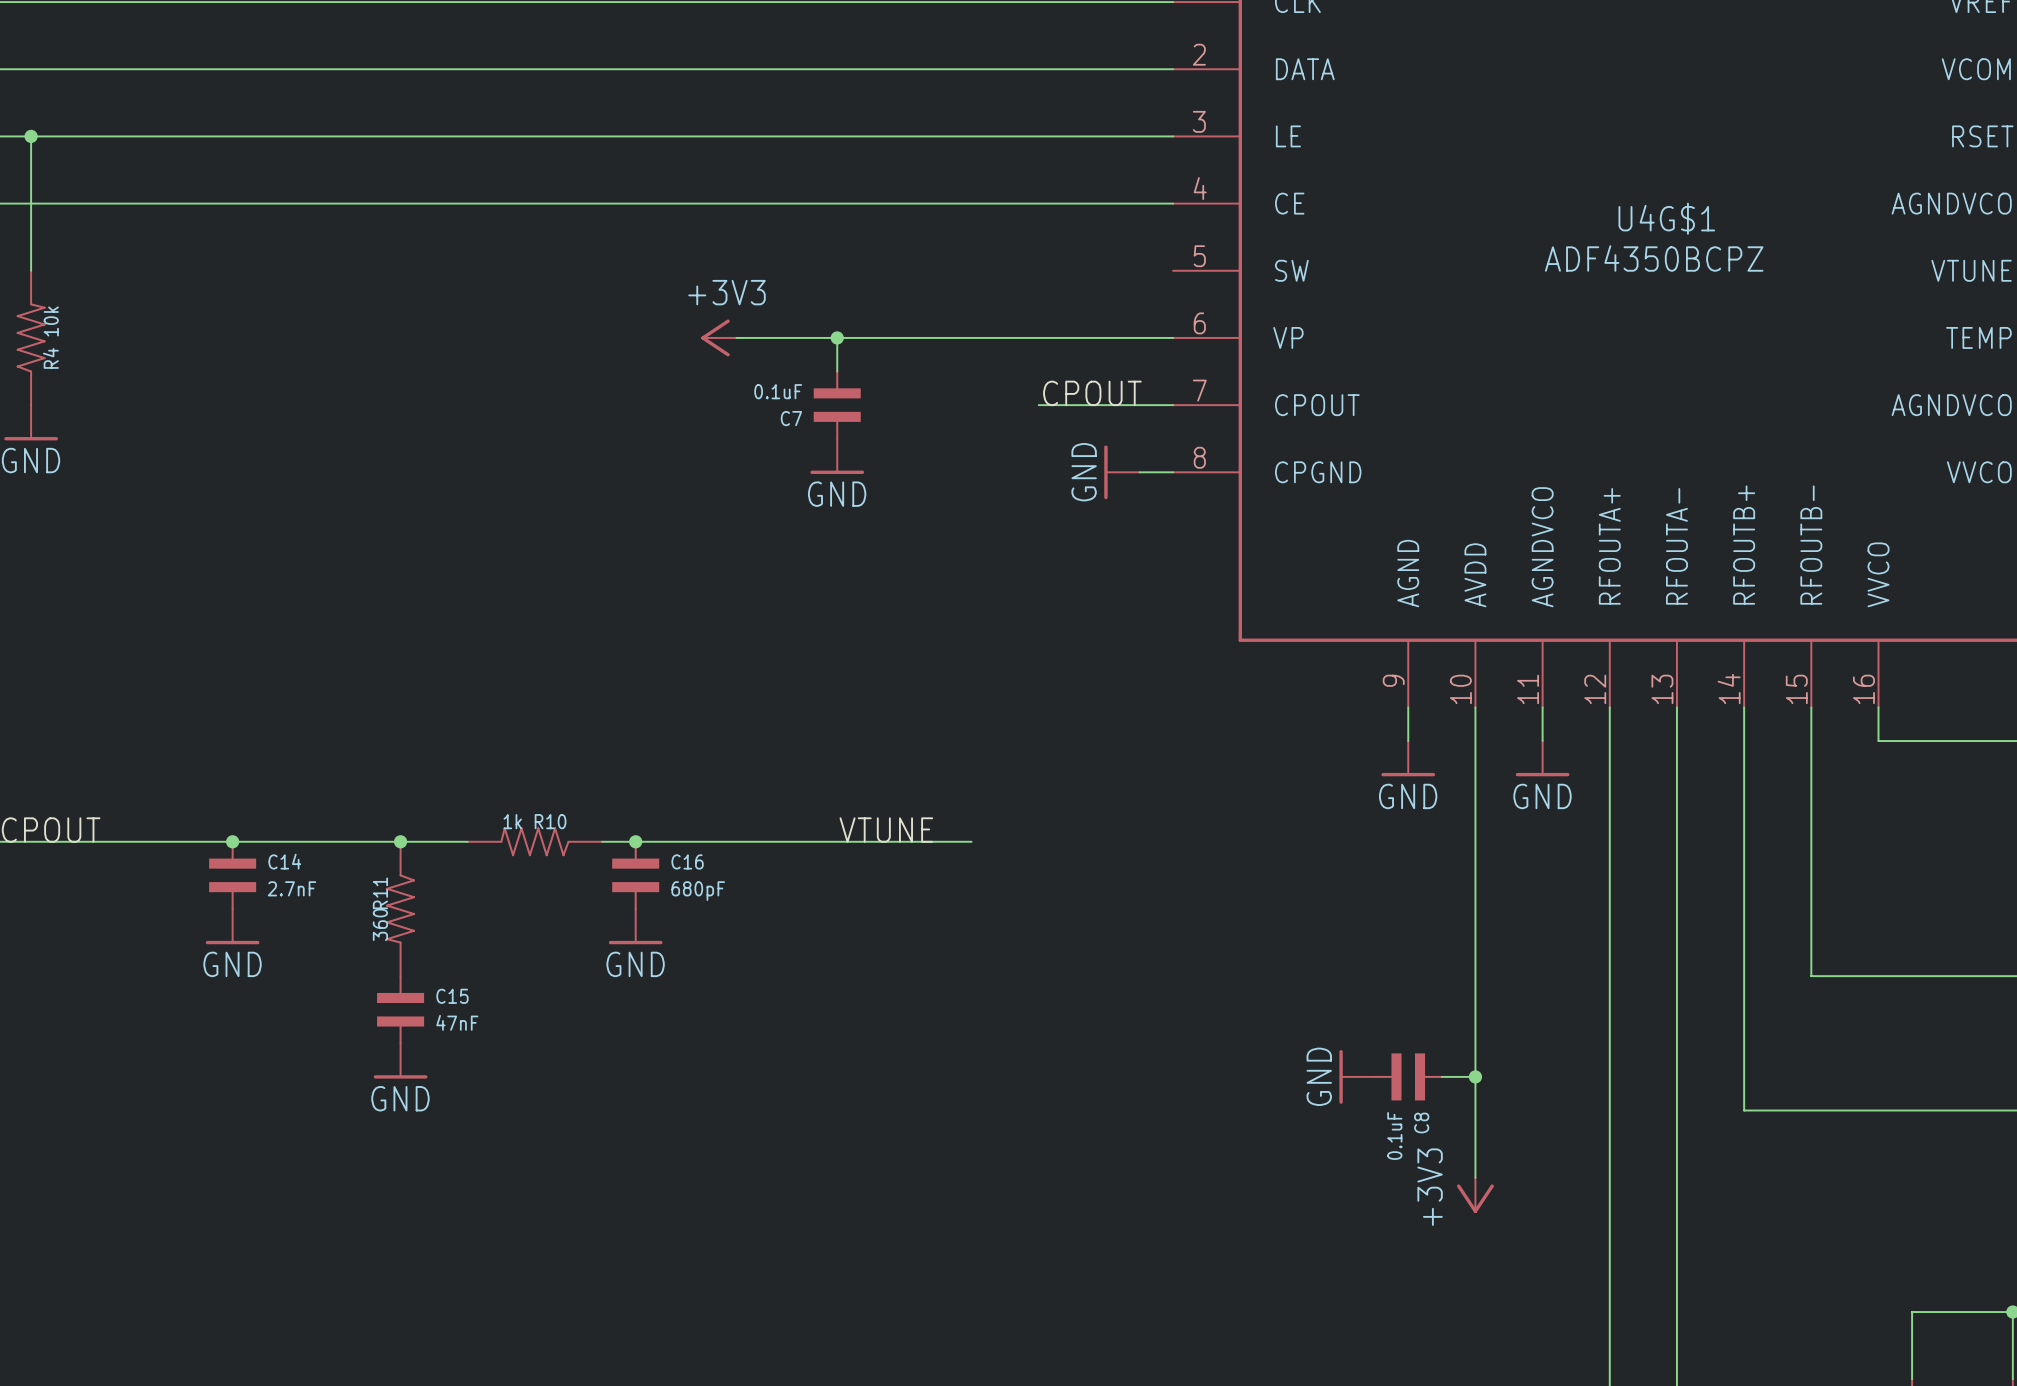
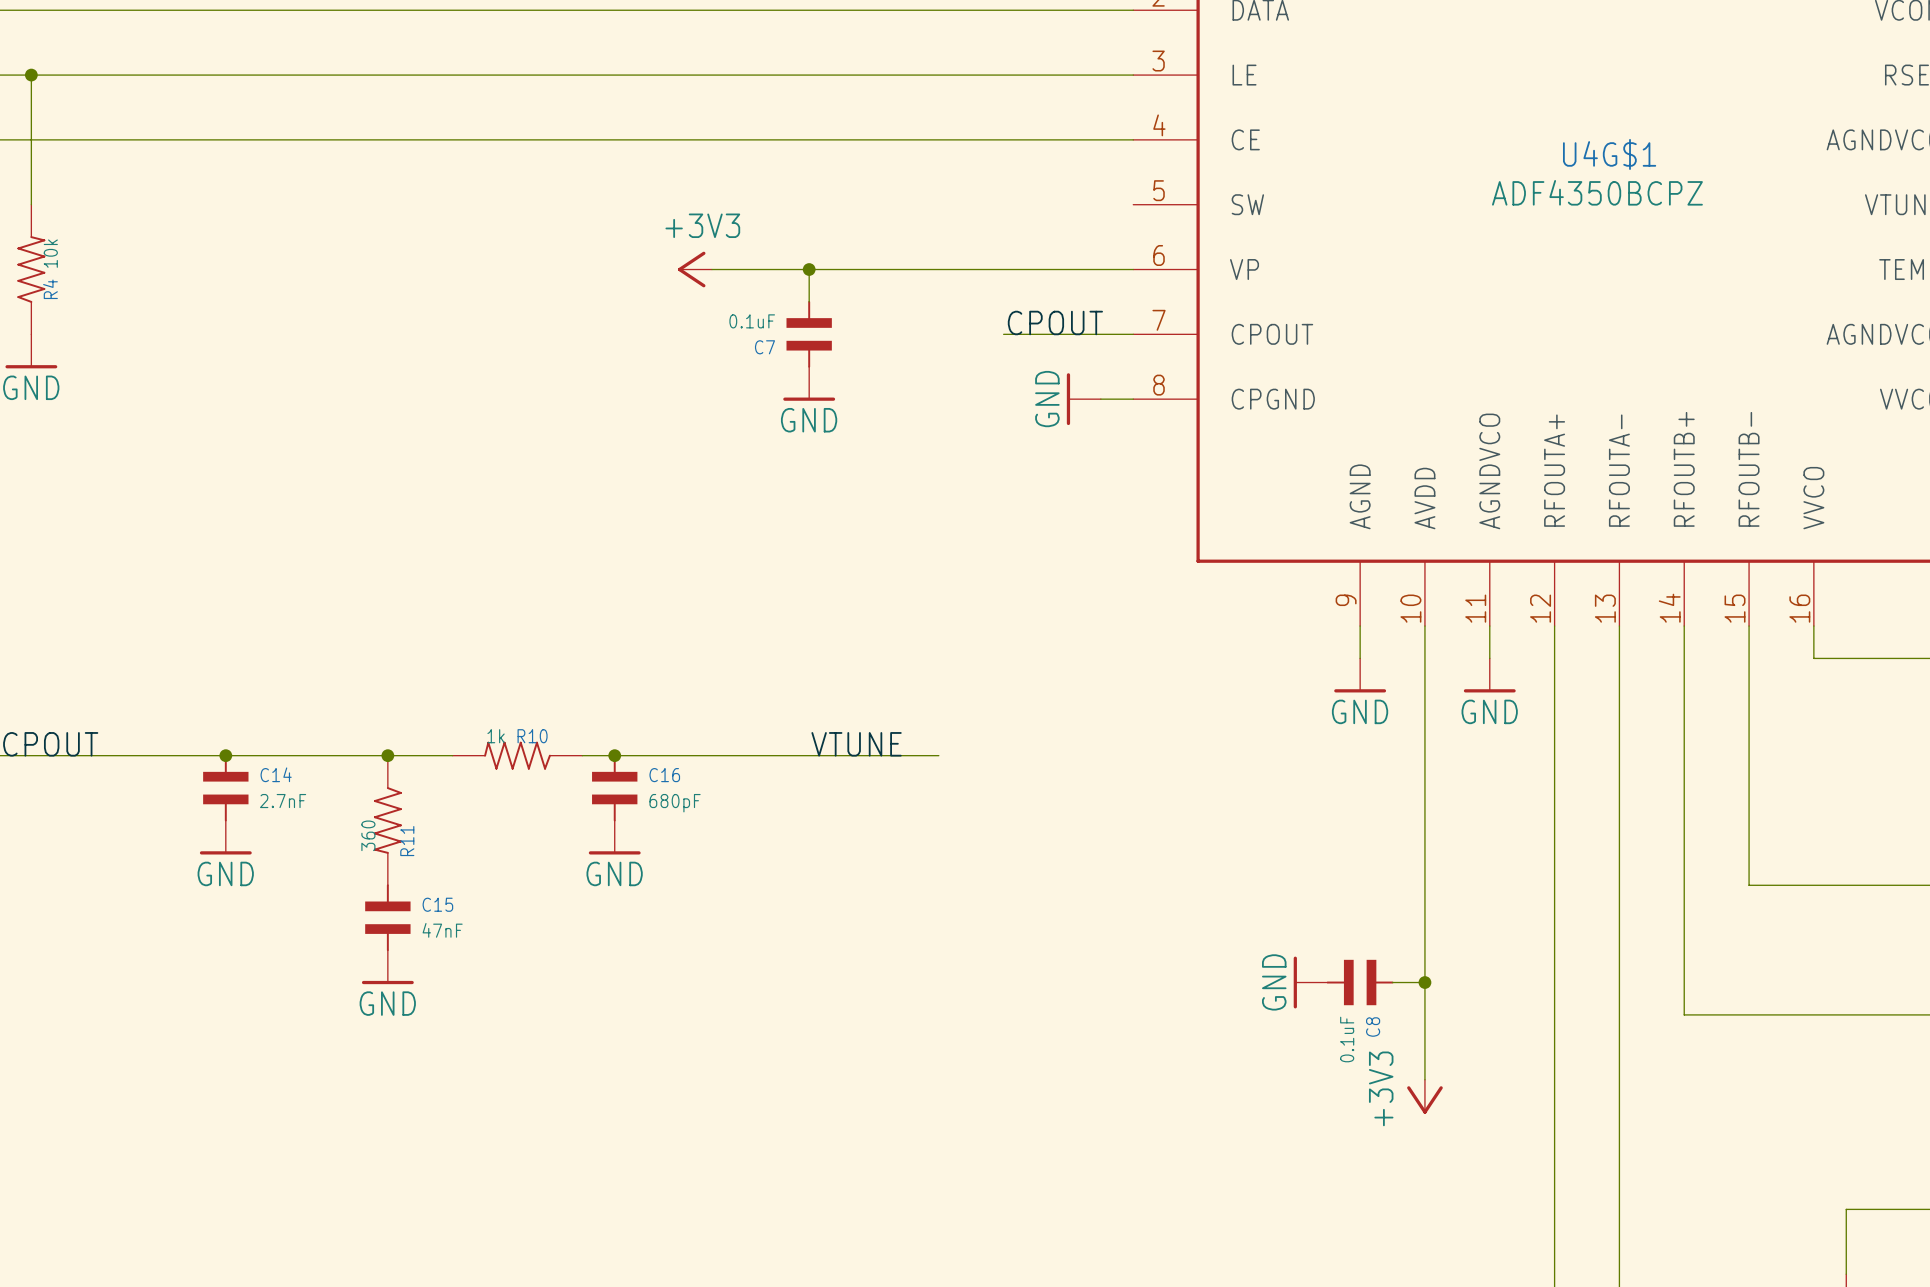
R11 name position: R11 (380, 893) -> R11 (407, 841)

